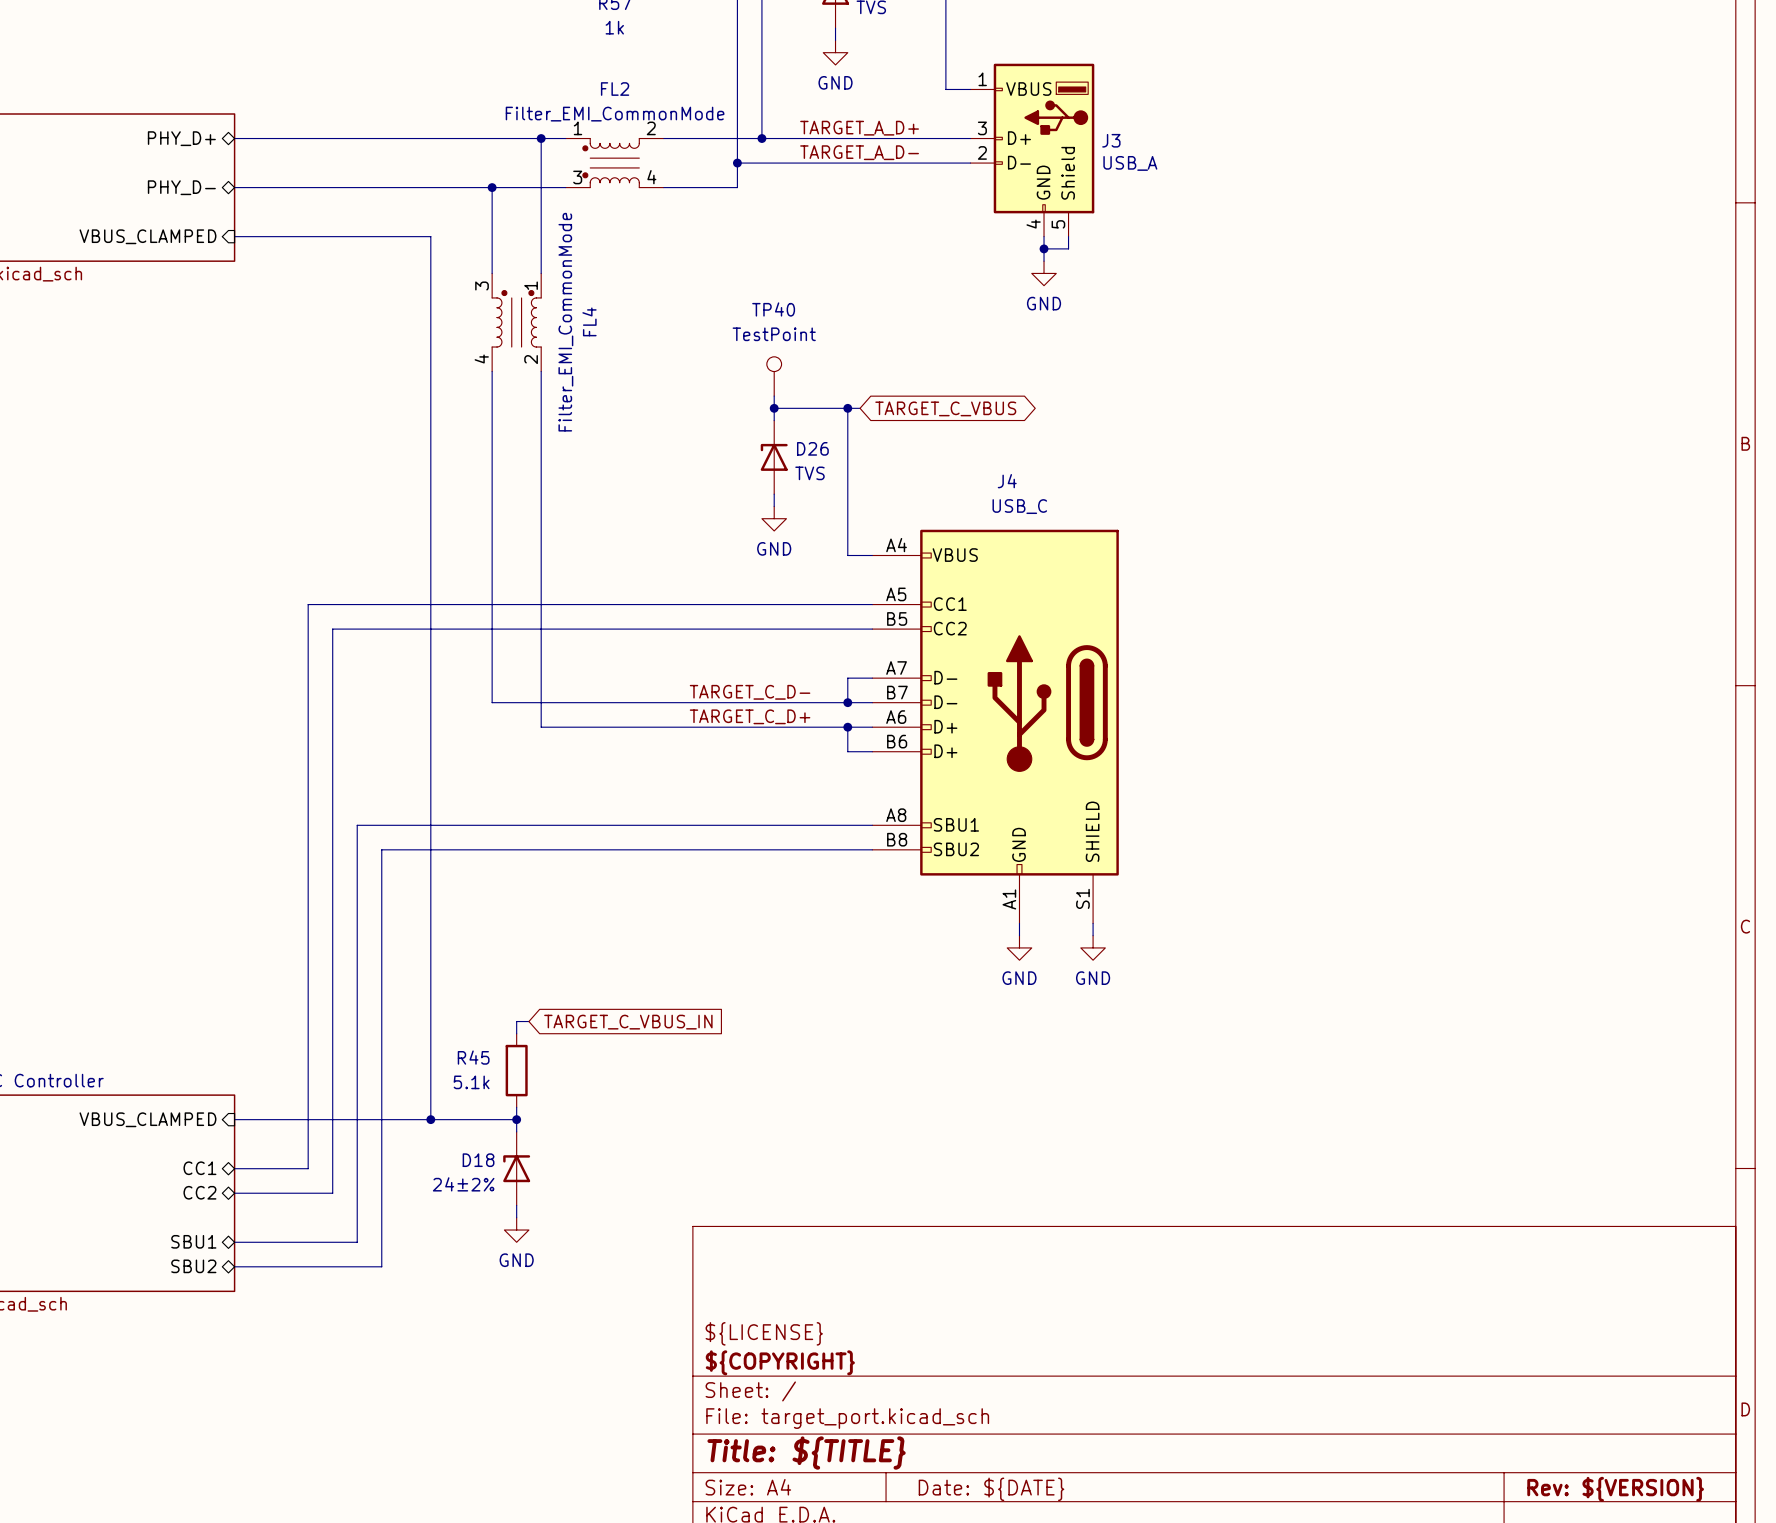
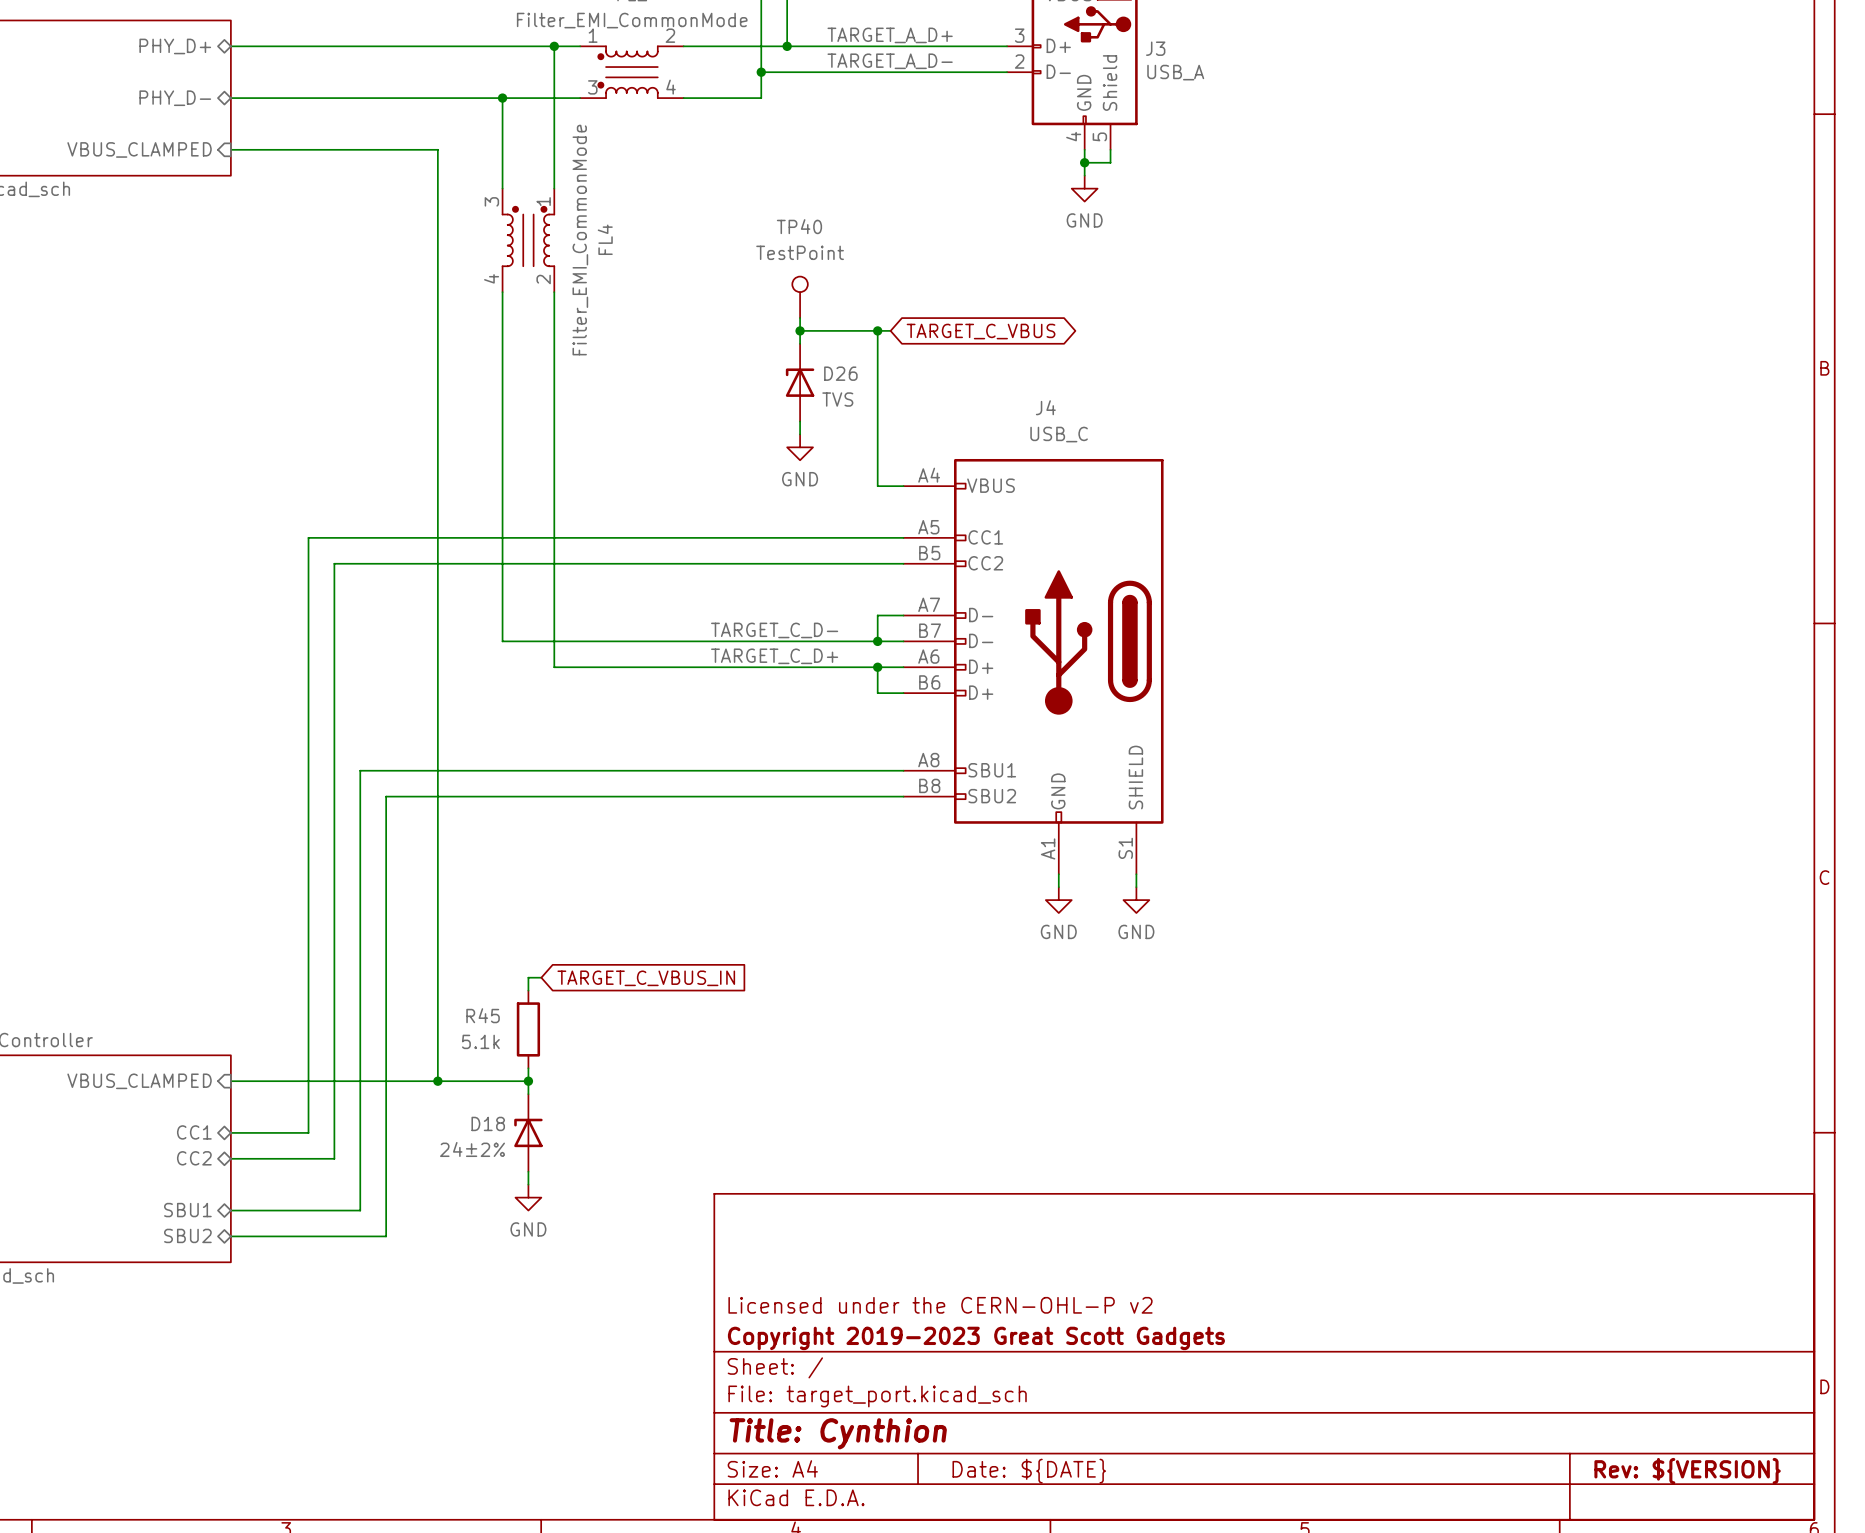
title block: ${LICENSE} (764, 1333) -> Licensed under the CERN-OHL-P v2 (940, 1305)
title block: ${COPYRIGHT} (780, 1362) -> Copyright 2019-2023 Great Scott Gadgets (976, 1338)
title block: Title: ${TITLE} (806, 1453) -> Title: Cynthion (838, 1433)

